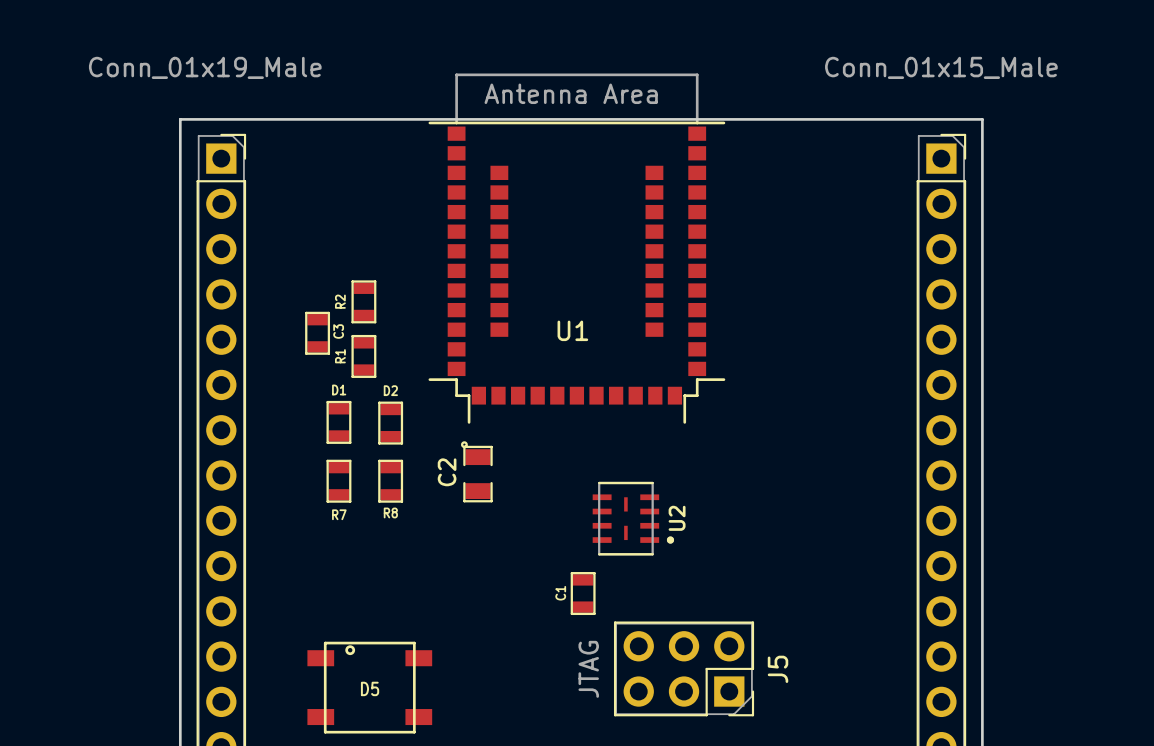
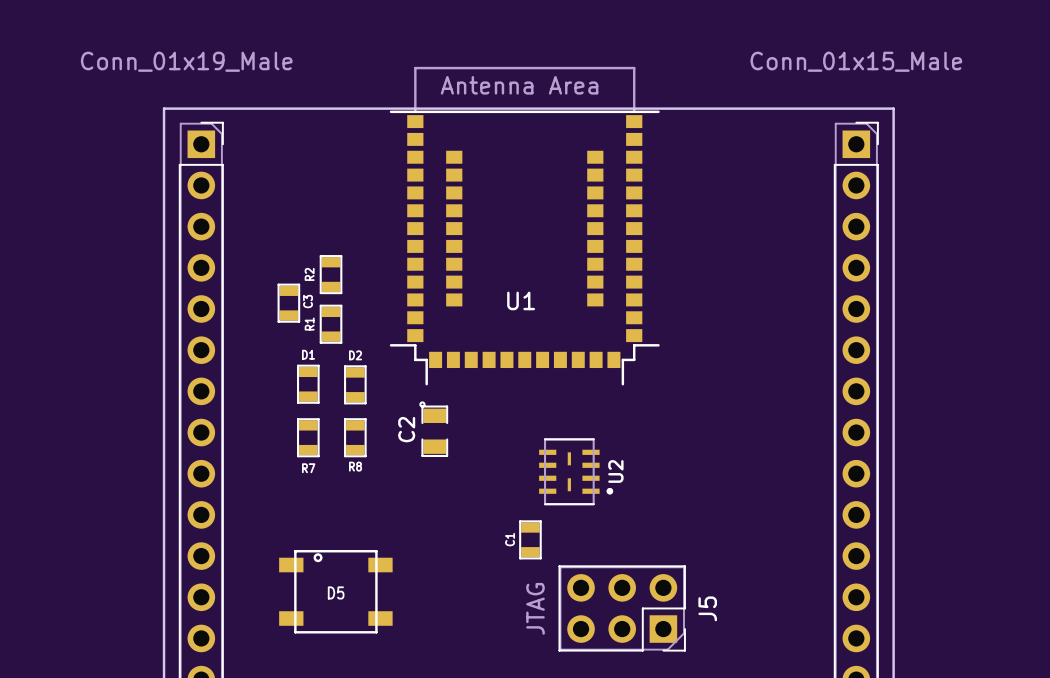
D5 position: (369, 687) -> (335, 591)

